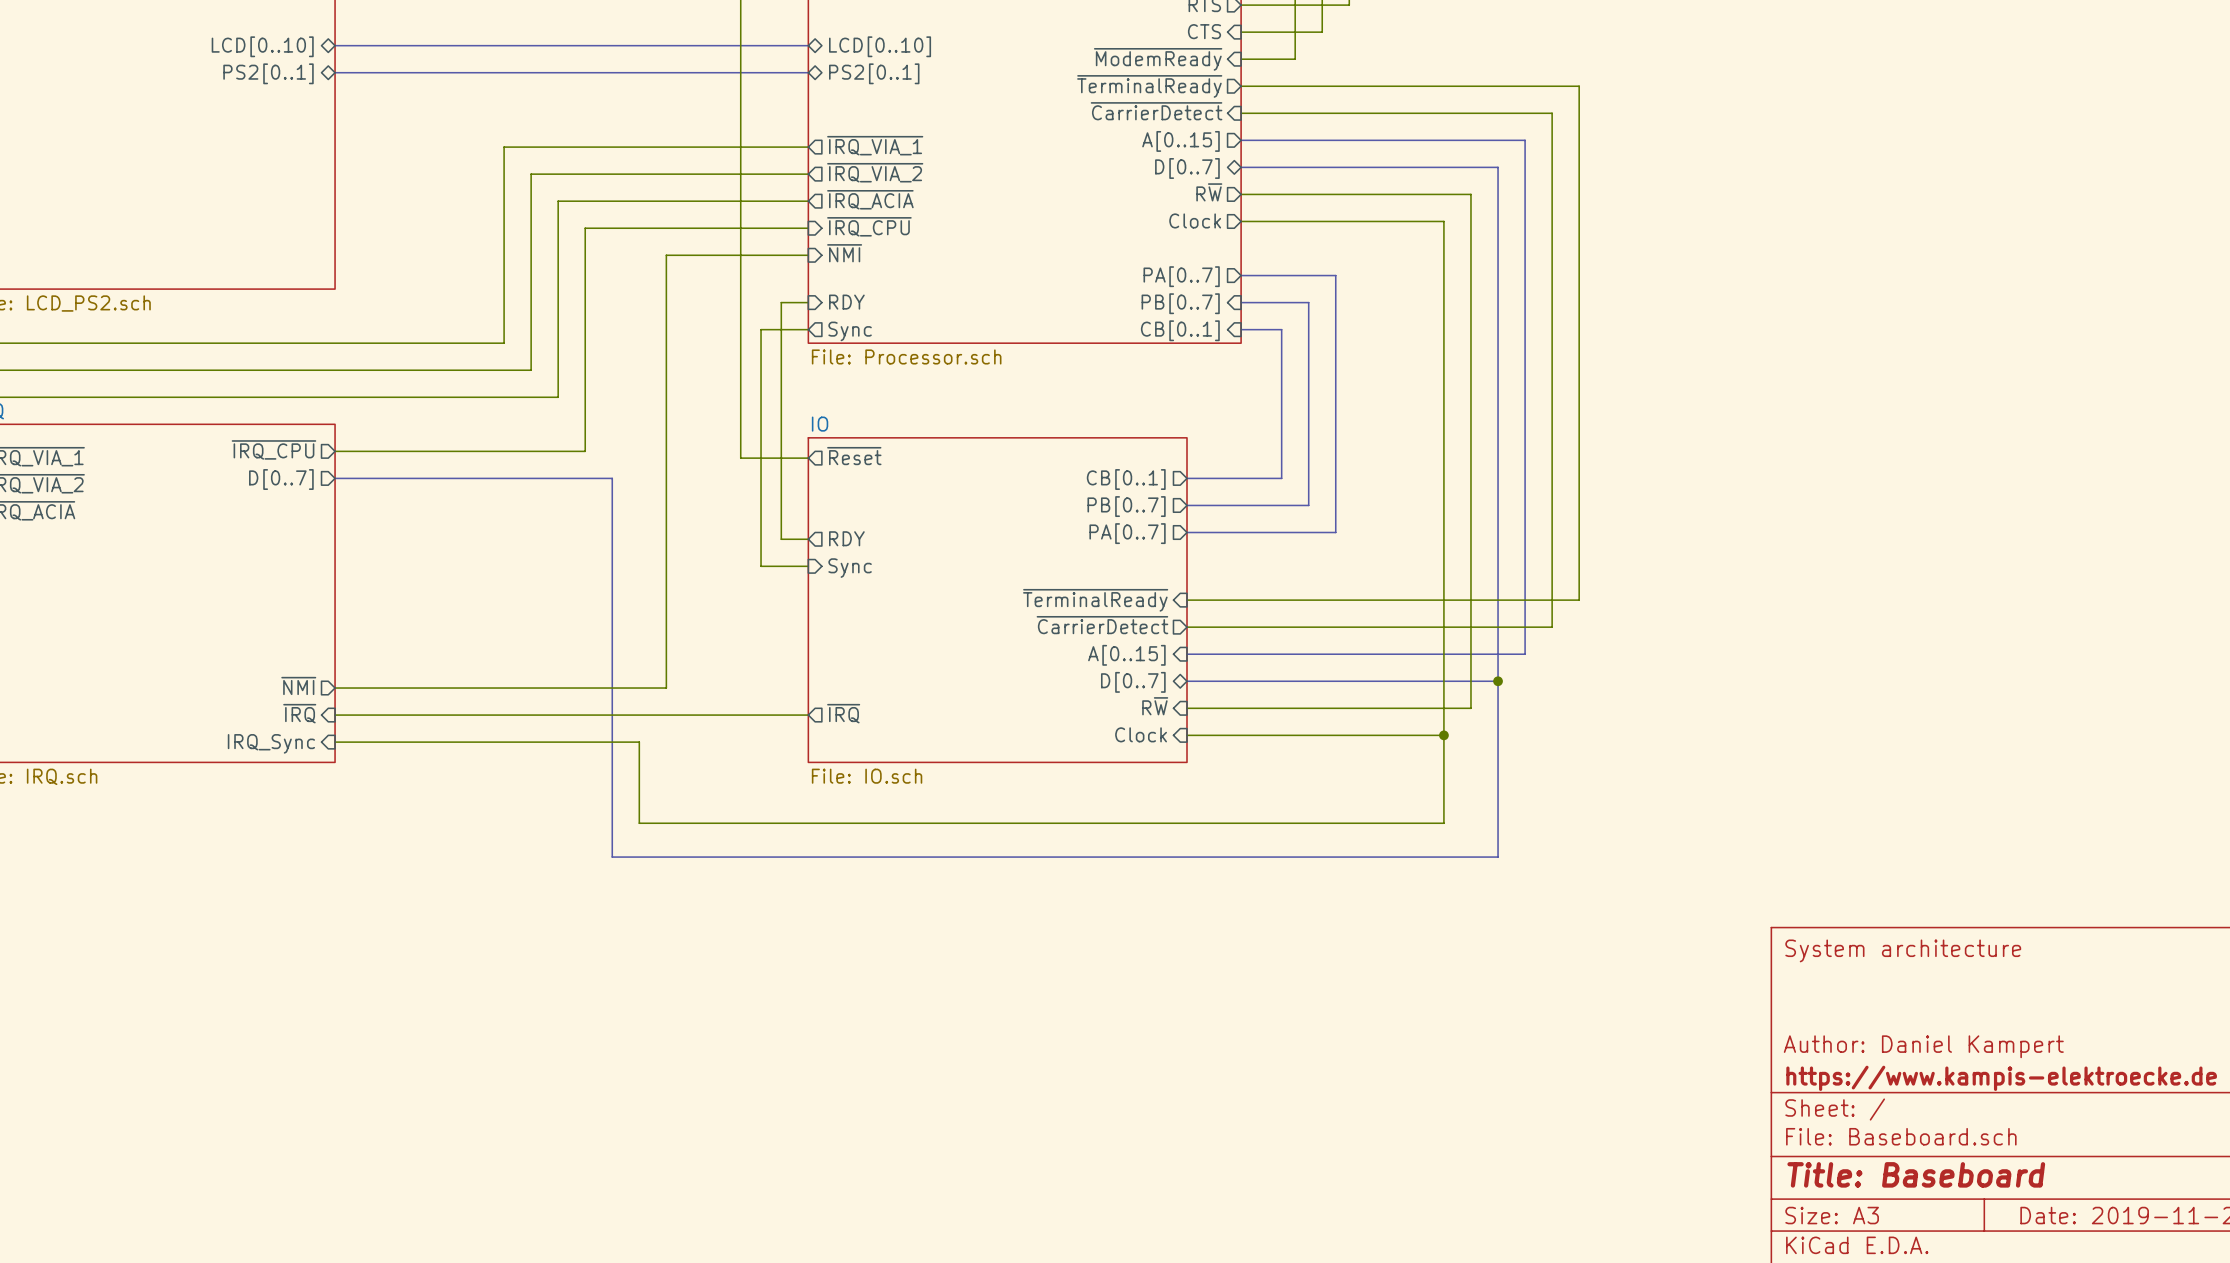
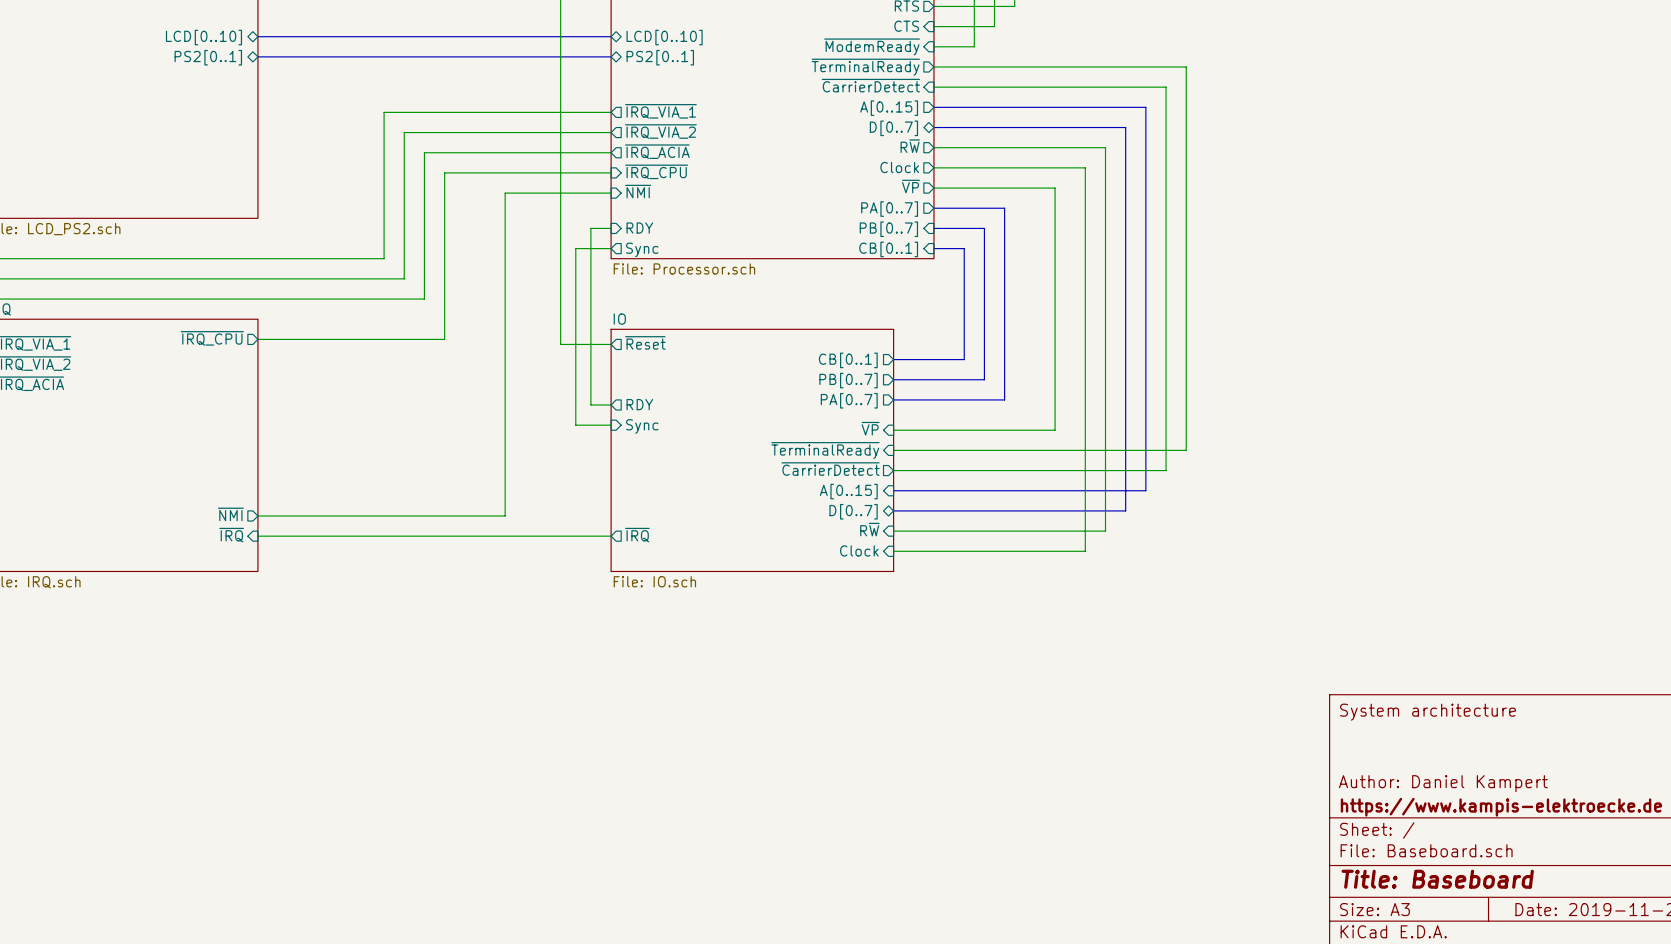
sheet pin: none -> ~{VP} (910, 186)
wire: none -> (933, 188) (1055, 188) (1055, 430) (893, 430)
bus: (335, 478) (612, 478) (612, 857) (1498, 857) (1498, 681) -> none
sheet pin: D[0..7] (281, 479) -> none
sheet pin: none -> ~{VP} (870, 428)
junction: (1498, 681) -> none
wire: (1443, 735) (1443, 823) (639, 823) (639, 742) (335, 742) -> none
junction: (1443, 735) -> none
sheet pin: IRQ_Sync (271, 743) -> none

